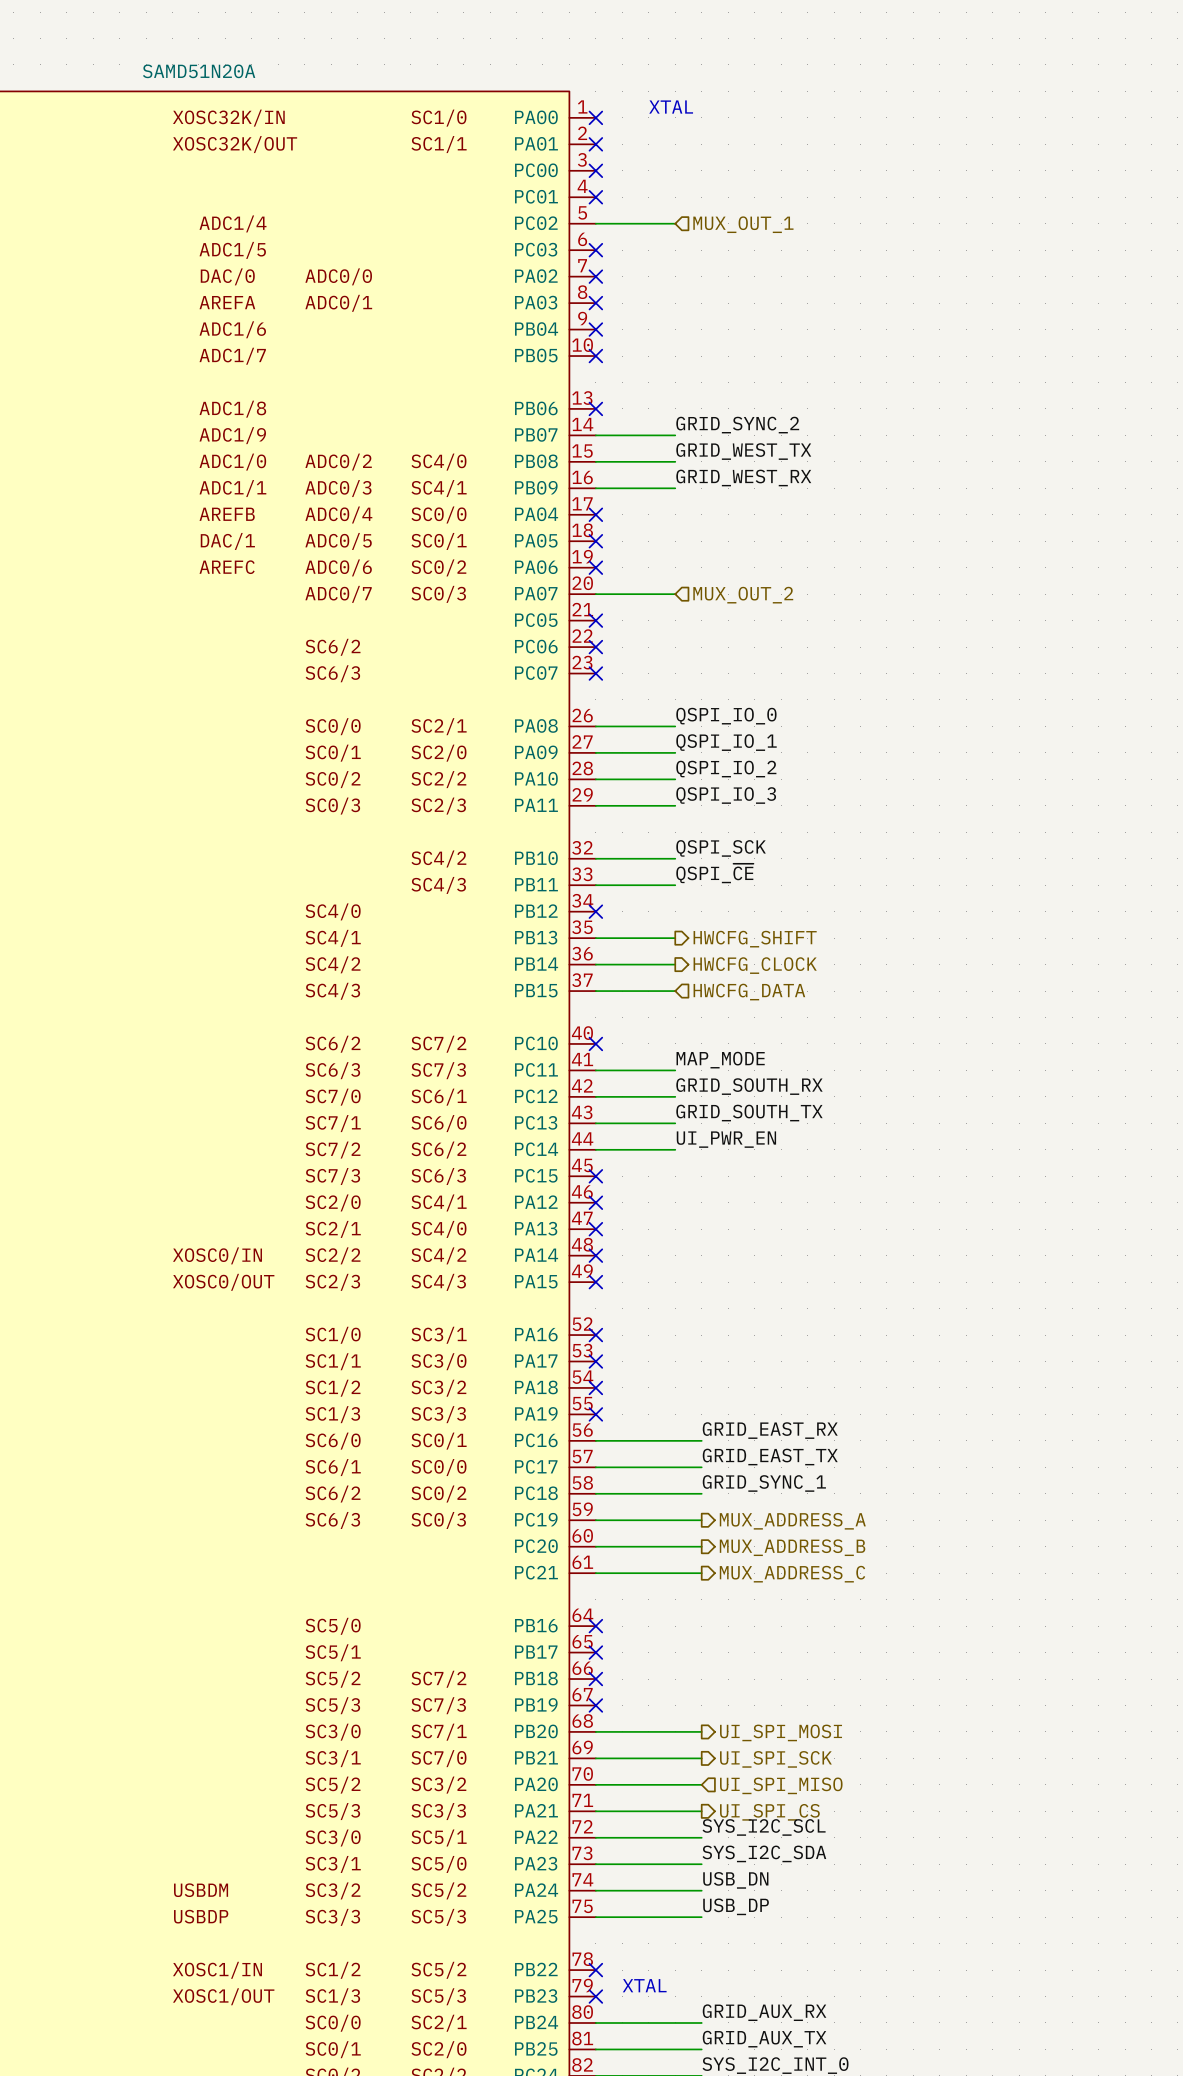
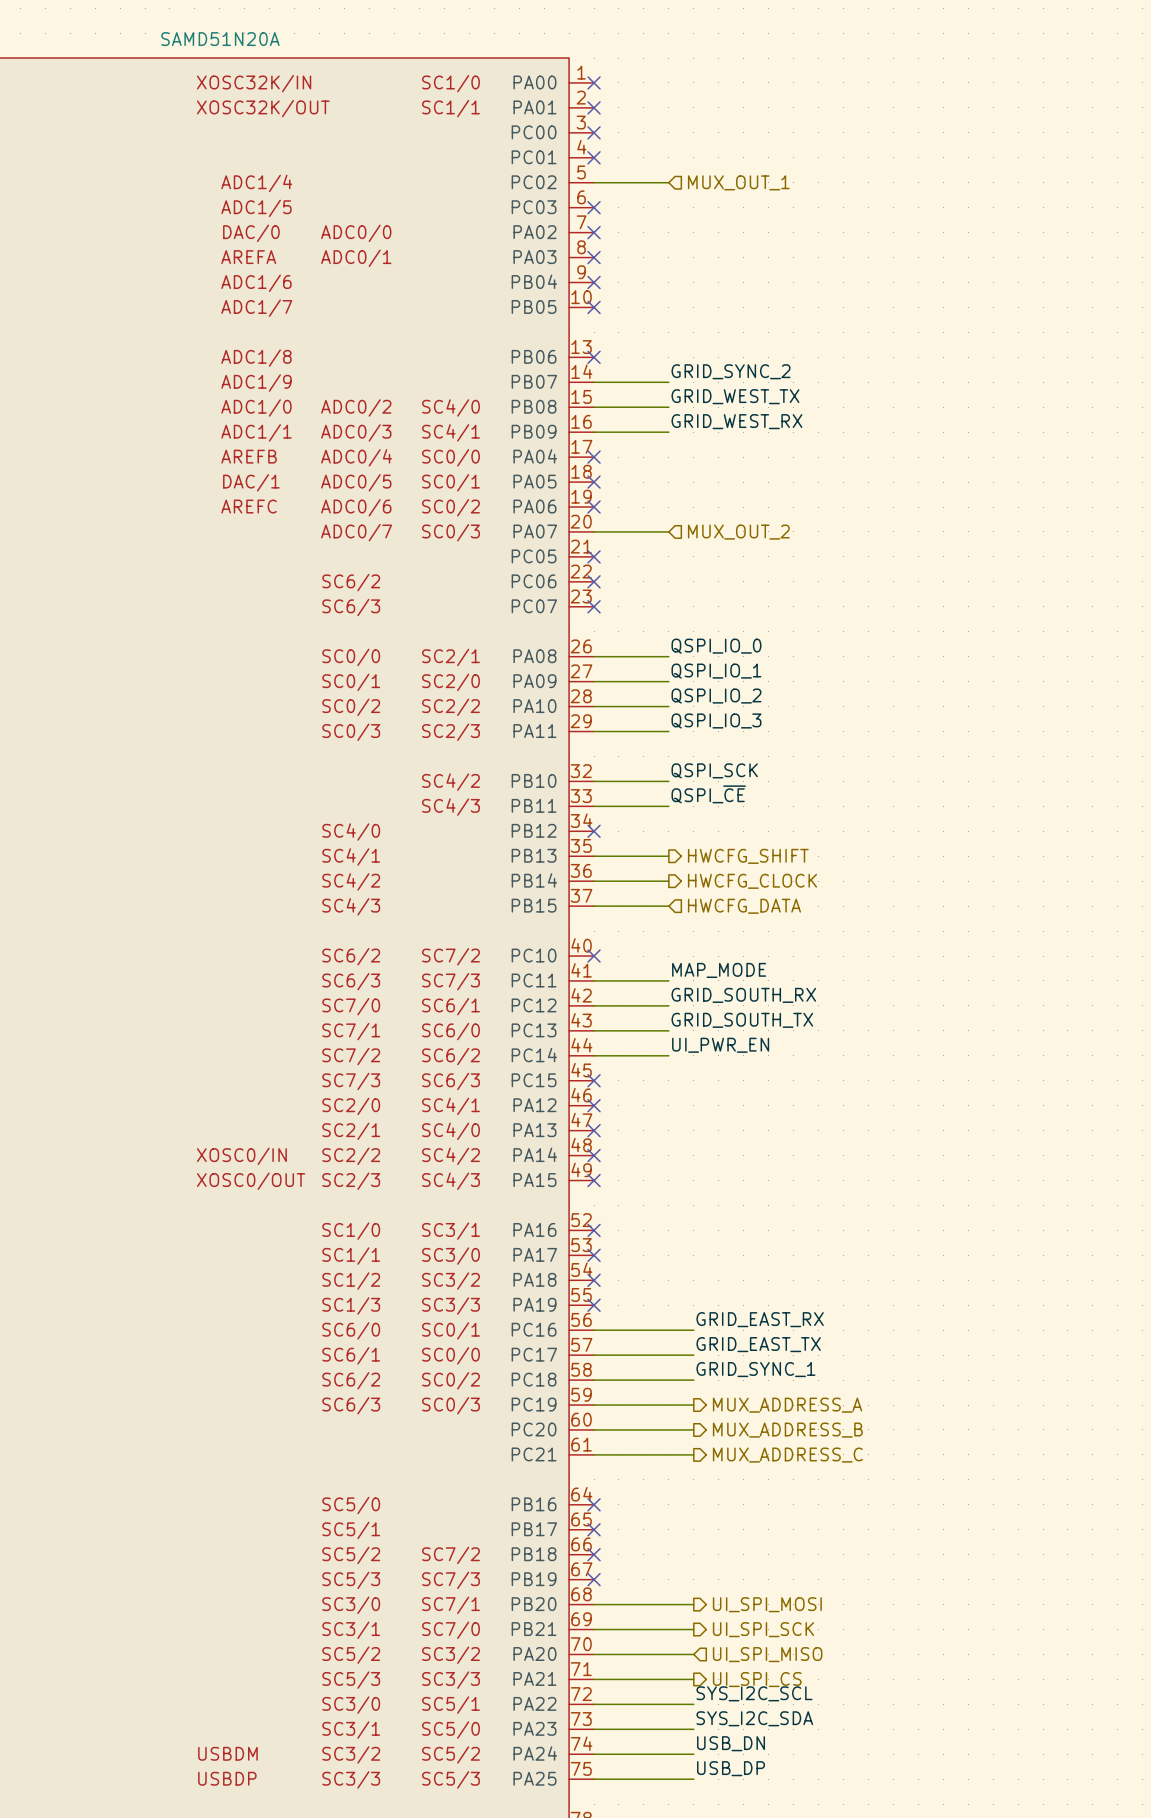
text: XTAL (671, 107) -> none

